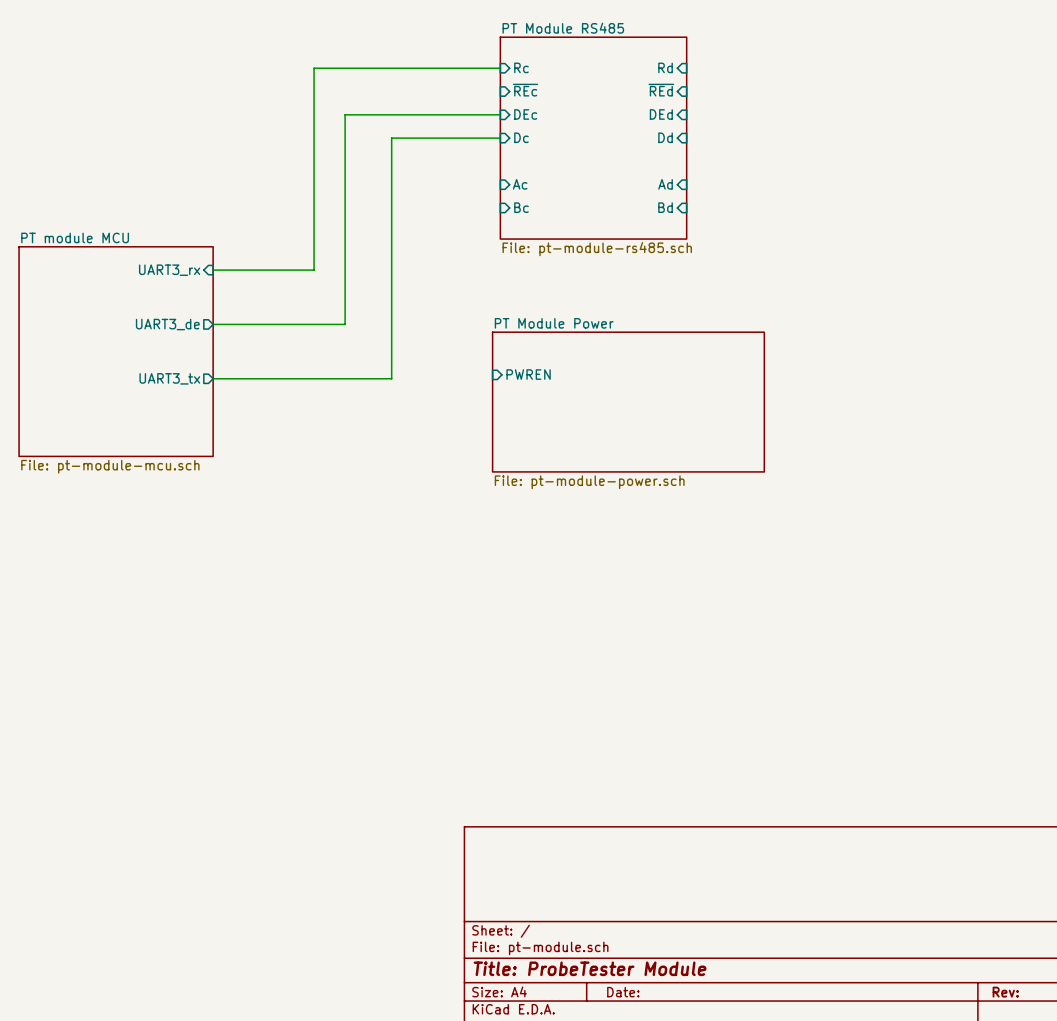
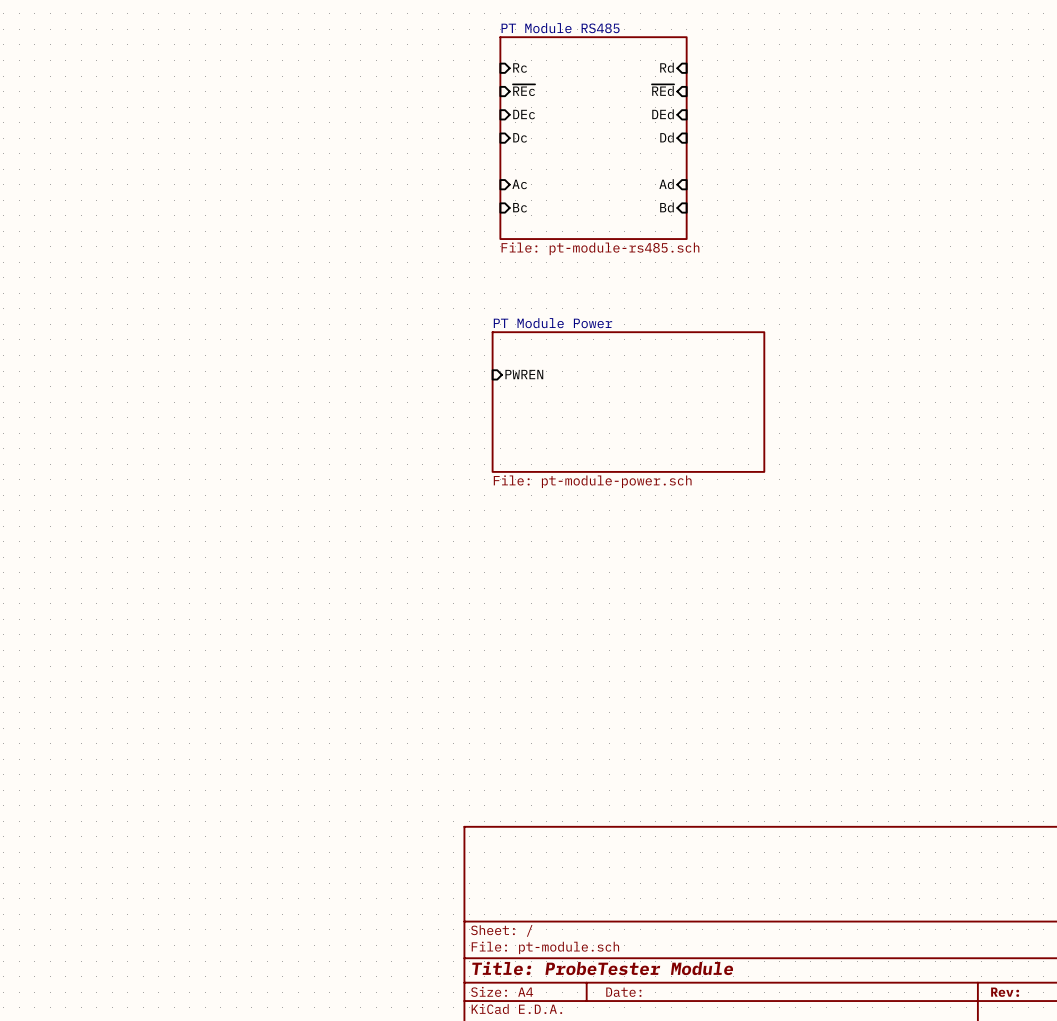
wire: (500, 68) (314, 68) (314, 270) (213, 270) -> none
wire: (500, 114) (345, 114) (345, 324) (213, 324) -> none
wire: (500, 138) (391, 138) (391, 378) (213, 378) -> none
sheet pin: UART3_rx (169, 270) -> none
sheet pin: UART3_de (167, 324) -> none
sheet PT module MCU: File: pt-module-mcu.sch (116, 351) -> none
sheet pin: UART3_tx (169, 378) -> none

